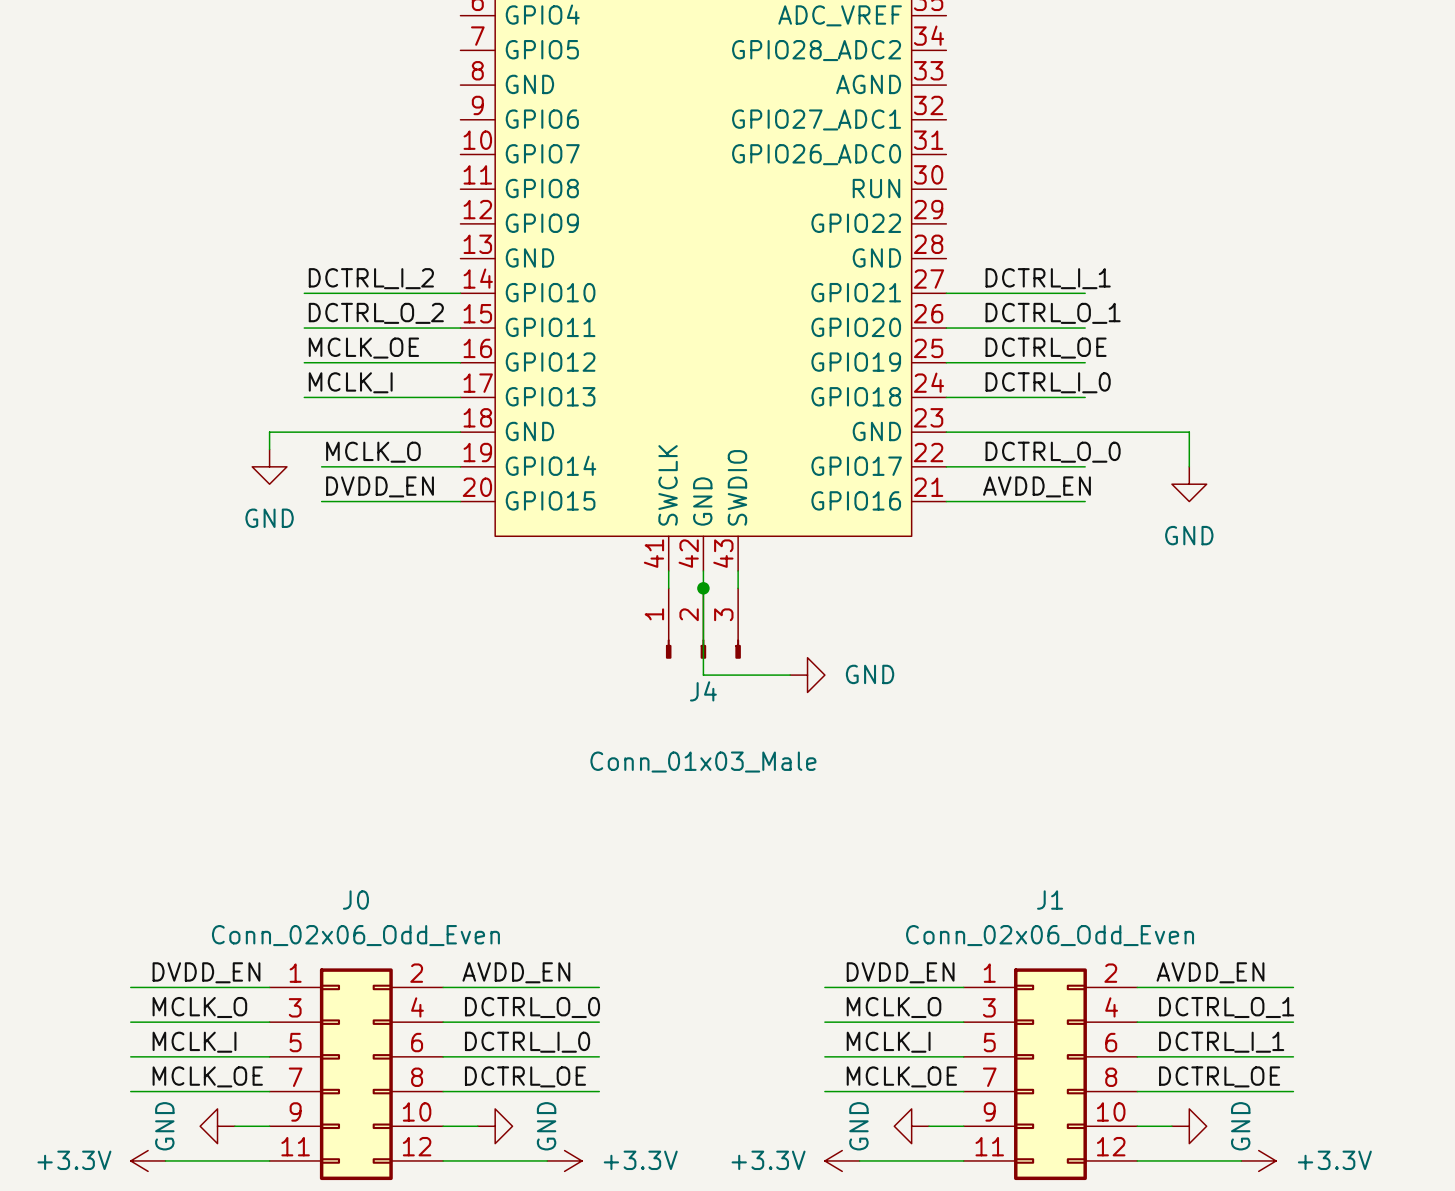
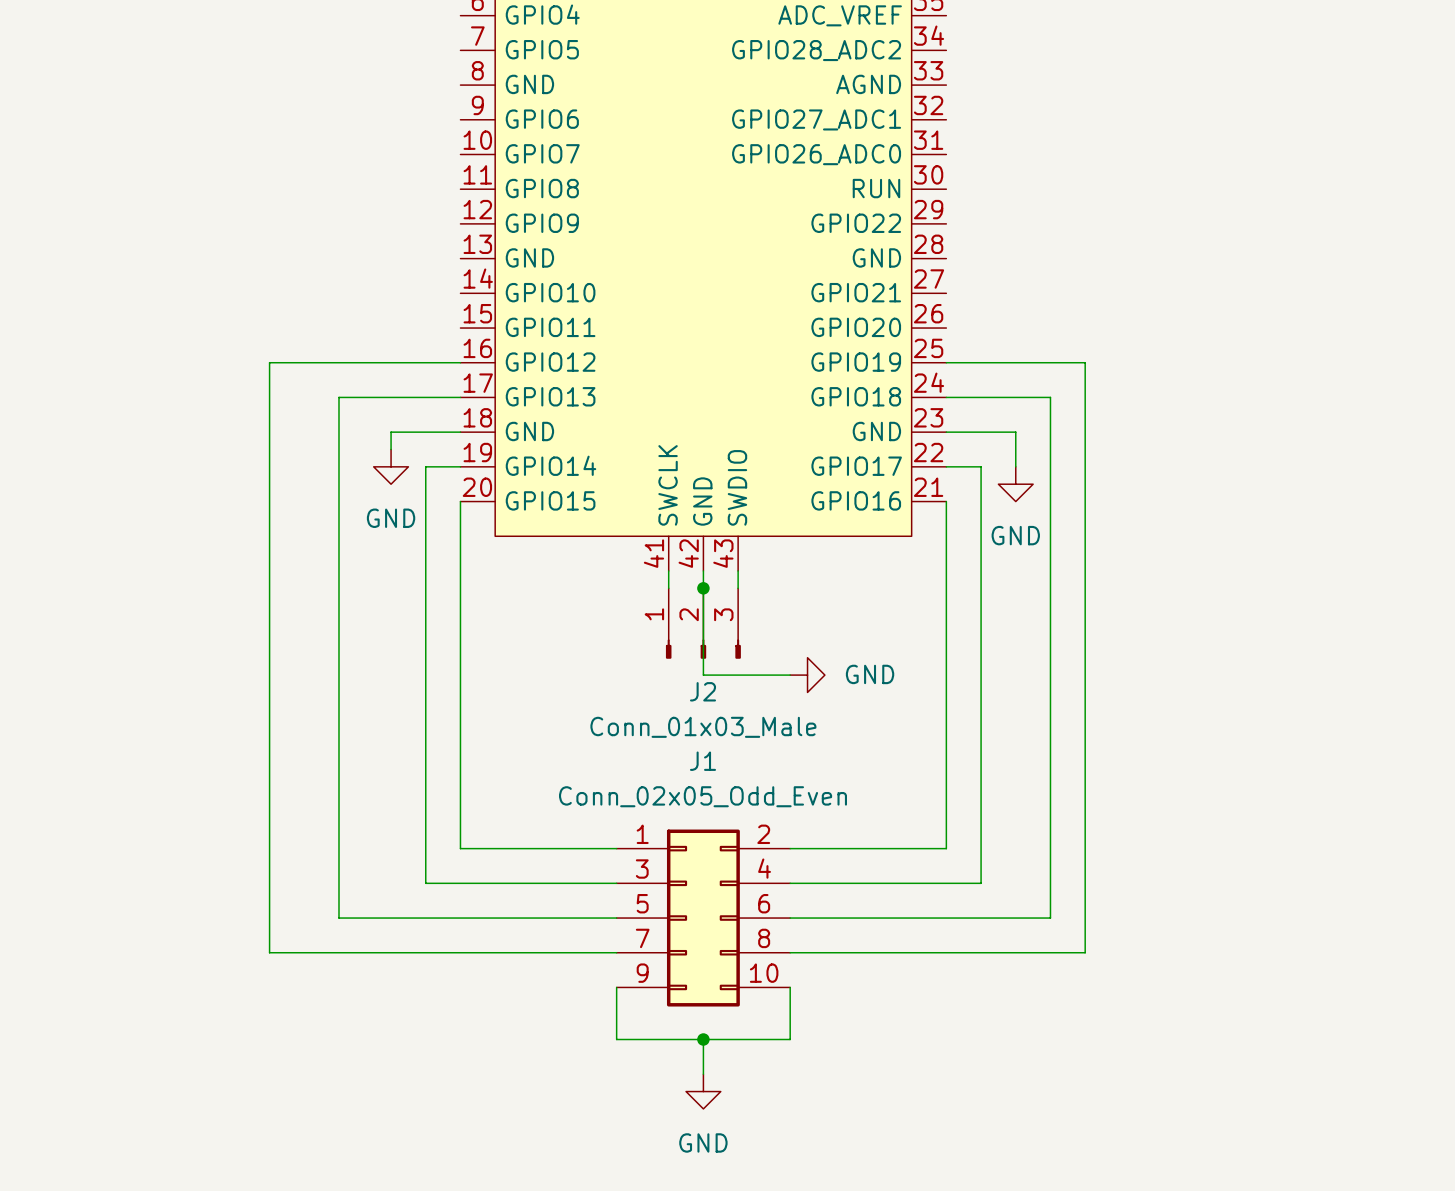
label: DCTRL_I_2 (371, 278) -> none
label: DCTRL_I_1 (1048, 278) -> none
wire: (304, 293) (460, 293) -> none
wire: (946, 293) (1085, 293) -> none
label: DCTRL_O_2 (376, 313) -> none
label: DCTRL_O_1 (1053, 313) -> none
wire: (304, 328) (460, 328) -> none
wire: (946, 328) (1085, 328) -> none
label: MCLK_OE (363, 348) -> none
label: DCTRL_OE (1046, 348) -> none
wire: none -> (1085, 362) (1085, 952) (790, 952)
label: MCLK_I (350, 382) -> none
label: DCTRL_I_0 (1048, 382) -> none
wire: (304, 397) (338, 397) -> (616, 918) (338, 918) (338, 397)
wire: (1050, 397) (1085, 397) -> (1050, 397) (1050, 918) (790, 918)
wire: (269, 432) (391, 432) -> (269, 432) (269, 362) (304, 362)
wire: none -> (391, 432) (391, 449)
wire: (1015, 432) (1189, 432) (1189, 466) -> (1015, 432) (1015, 466)
wire: none -> (269, 449) (269, 952) (616, 952)
label: MCLK_O (373, 452) -> none
label: DCTRL_O_0 (1053, 452) -> none
power symbol position: GND (269, 466) -> GND (391, 466)
wire: (321, 466) (425, 466) -> (616, 883) (425, 883) (425, 466)
wire: (981, 466) (1085, 466) -> (981, 466) (981, 883) (790, 883)
power symbol position: GND (1189, 484) -> GND (1015, 484)
label: DVDD_EN (380, 486) -> none
label: AVDD_EN (1036, 486) -> none
wire: (321, 501) (460, 501) -> (616, 848) (460, 848) (460, 501)
wire: (946, 501) (1085, 501) -> (946, 501) (946, 848) (790, 848)
J4 name: J4 (703, 691) -> J2 (703, 691)
J4 value position: Conn_01x03_Male (703, 762) -> Conn_01x03_Male (703, 727)
J1 value: Conn_02x06_Odd_Even (1050, 935) -> Conn_02x05_Odd_Even (703, 796)
J1 symbol: [963, 968, 1138, 1181] -> [616, 829, 791, 1007]
label: DVDD_EN (206, 972) -> none
label: AVDD_EN (516, 972) -> none
label: DVDD_EN (900, 972) -> none
label: AVDD_EN (1210, 972) -> none
wire: (130, 987) (269, 987) -> none
wire: (443, 987) (599, 987) -> none
wire: none -> (616, 987) (616, 1039) (790, 1039) (790, 987)
wire: (824, 987) (963, 987) -> none
wire: (1137, 987) (1293, 987) -> none
label: MCLK_O (199, 1007) -> none
label: DCTRL_O_0 (532, 1007) -> none
label: MCLK_O (894, 1007) -> none
label: DCTRL_O_1 (1226, 1007) -> none
wire: (130, 1022) (269, 1022) -> none
wire: (443, 1022) (599, 1022) -> none
wire: (824, 1022) (963, 1022) -> none
wire: (1137, 1022) (1293, 1022) -> none
wire: none -> (703, 1039) (703, 1074)
junction: none -> (703, 1039)
label: MCLK_I (194, 1042) -> none
label: DCTRL_I_0 (527, 1042) -> none
label: MCLK_I (888, 1042) -> none
label: DCTRL_I_1 (1221, 1042) -> none
wire: (130, 1056) (269, 1056) -> none
wire: (443, 1056) (599, 1056) -> none
wire: (824, 1056) (963, 1056) -> none
wire: (1137, 1056) (1293, 1056) -> none
J0: Conn_02x06_Odd_Even (356, 1074) -> none
label: MCLK_OE (207, 1076) -> none
label: DCTRL_OE (525, 1076) -> none
label: MCLK_OE (901, 1076) -> none
label: DCTRL_OE (1219, 1076) -> none
wire: (130, 1091) (269, 1091) -> none
wire: (443, 1091) (599, 1091) -> none
power symbol: none -> GND (703, 1091)
wire: (824, 1091) (963, 1091) -> none
wire: (1137, 1091) (1293, 1091) -> none
power symbol: GND (217, 1126) -> none
wire: (234, 1126) (269, 1126) -> none
wire: (443, 1126) (477, 1126) -> none
power symbol: GND (495, 1126) -> none
power symbol: GND (911, 1126) -> none
wire: (929, 1126) (963, 1126) -> none
wire: (1137, 1126) (1171, 1126) -> none
power symbol: GND (1189, 1126) -> none
power symbol: +3.3V (148, 1160) -> none
wire: (165, 1160) (269, 1160) -> none
wire: (443, 1160) (547, 1160) -> none
power symbol: +3.3V (564, 1160) -> none
power symbol: +3.3V (842, 1160) -> none
wire: (859, 1160) (963, 1160) -> none
wire: (1137, 1160) (1241, 1160) -> none
power symbol: +3.3V (1258, 1160) -> none

